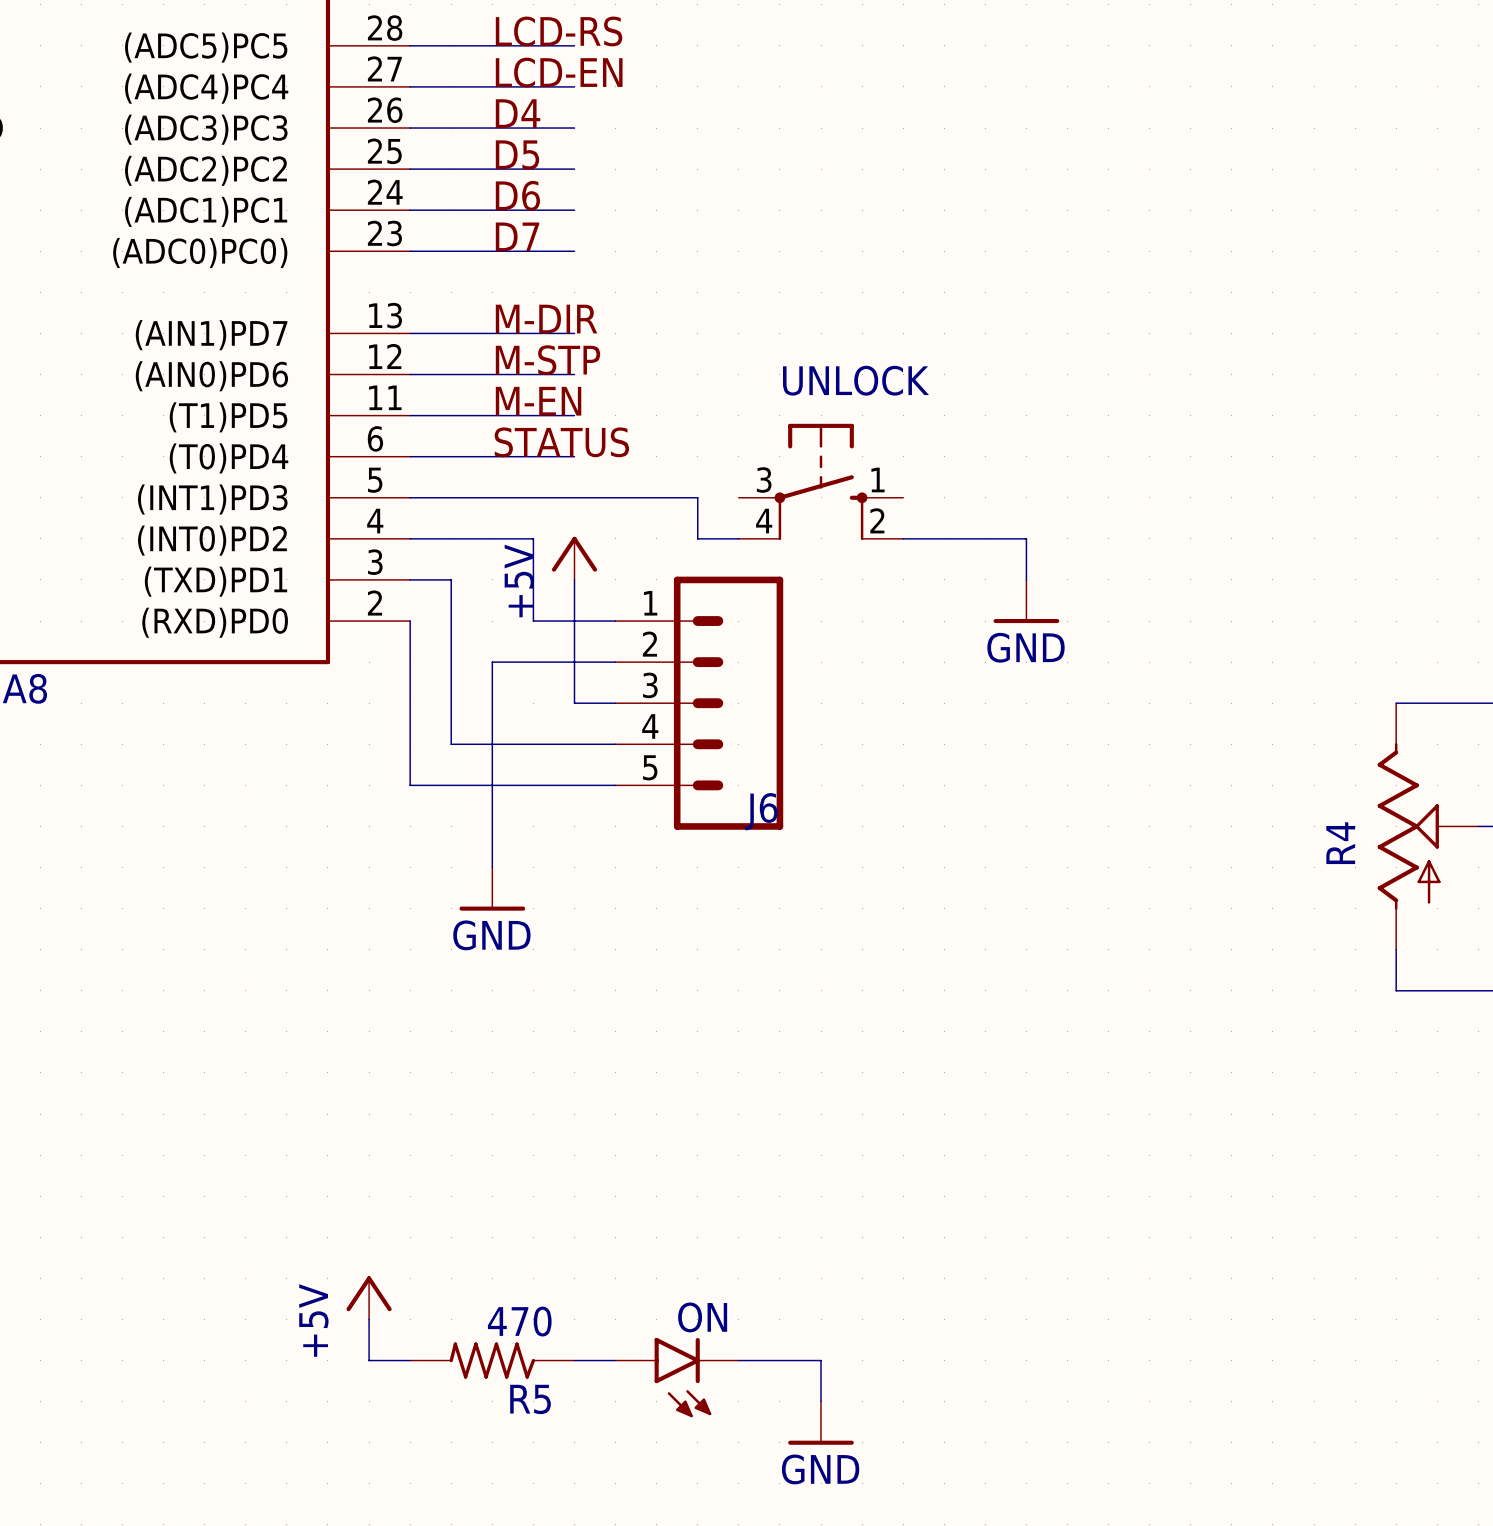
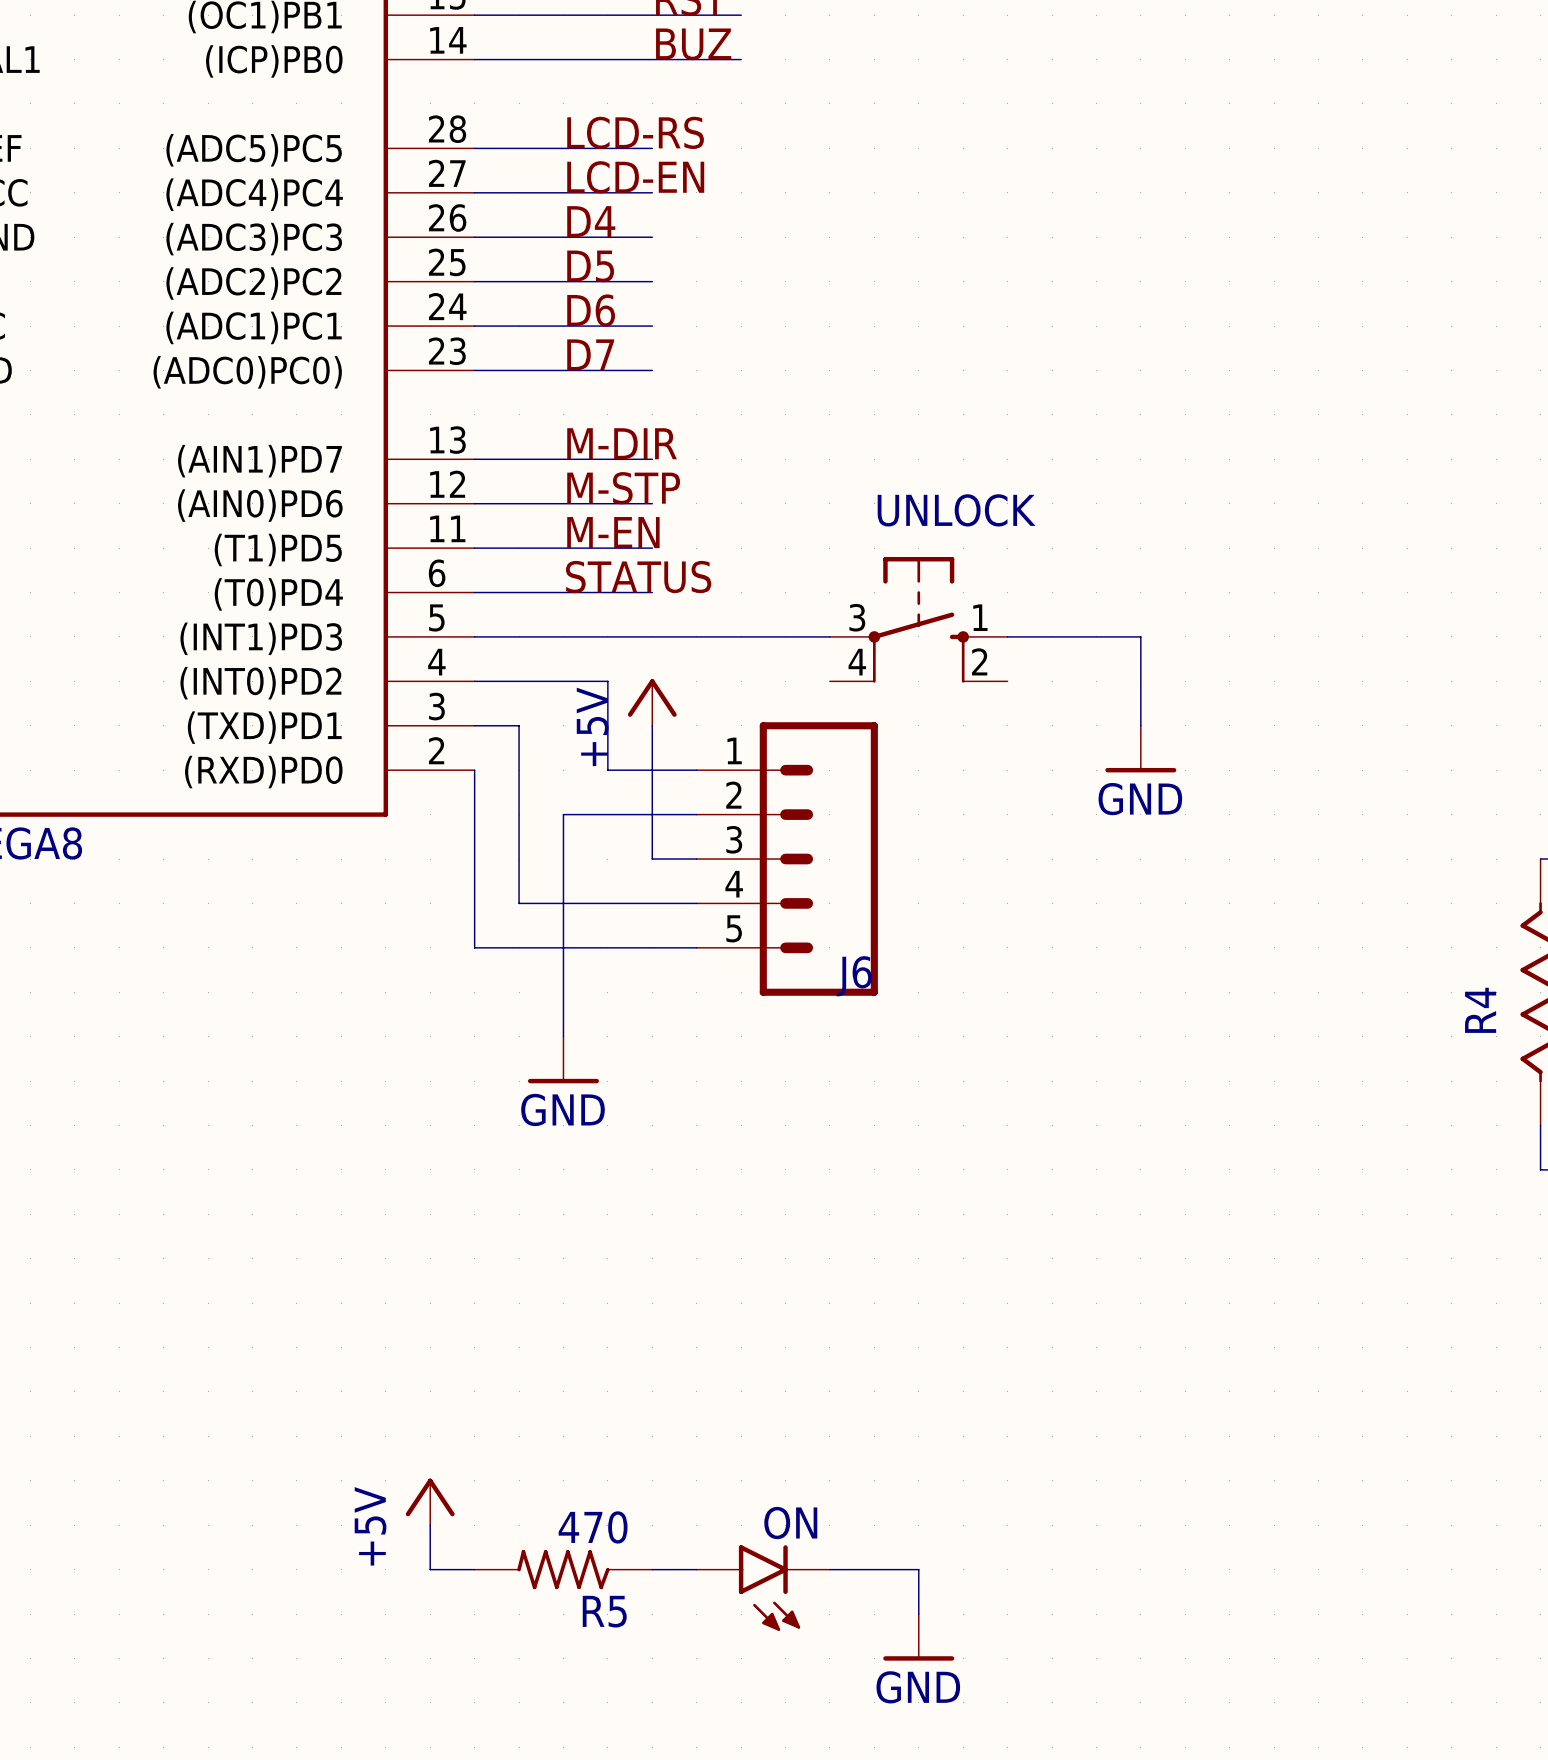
wire: (697, 497) (697, 538) (738, 538) -> (785, 636) (829, 636)
wire: (903, 538) (1026, 538) -> (1007, 636) (1140, 636) (1140, 681)

